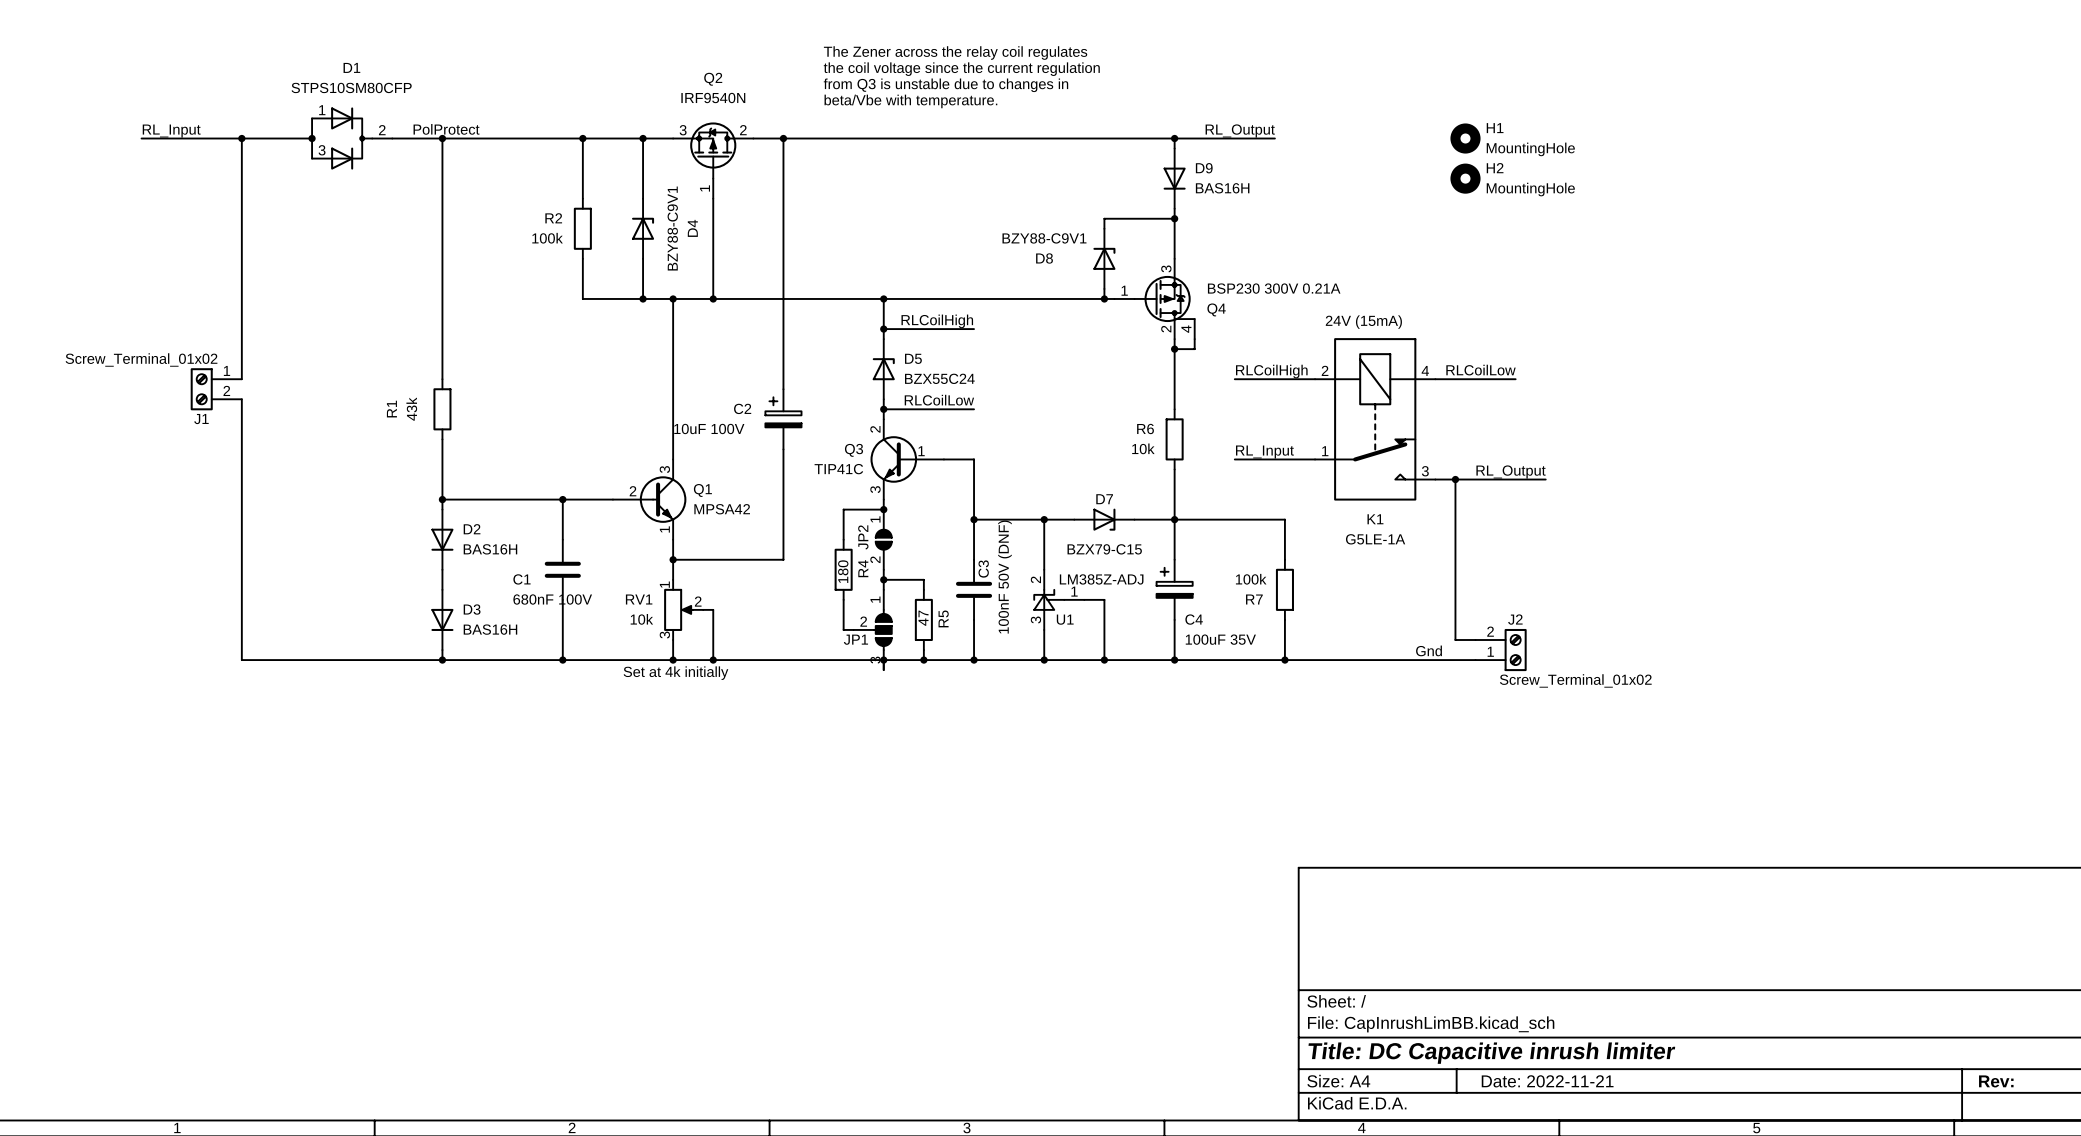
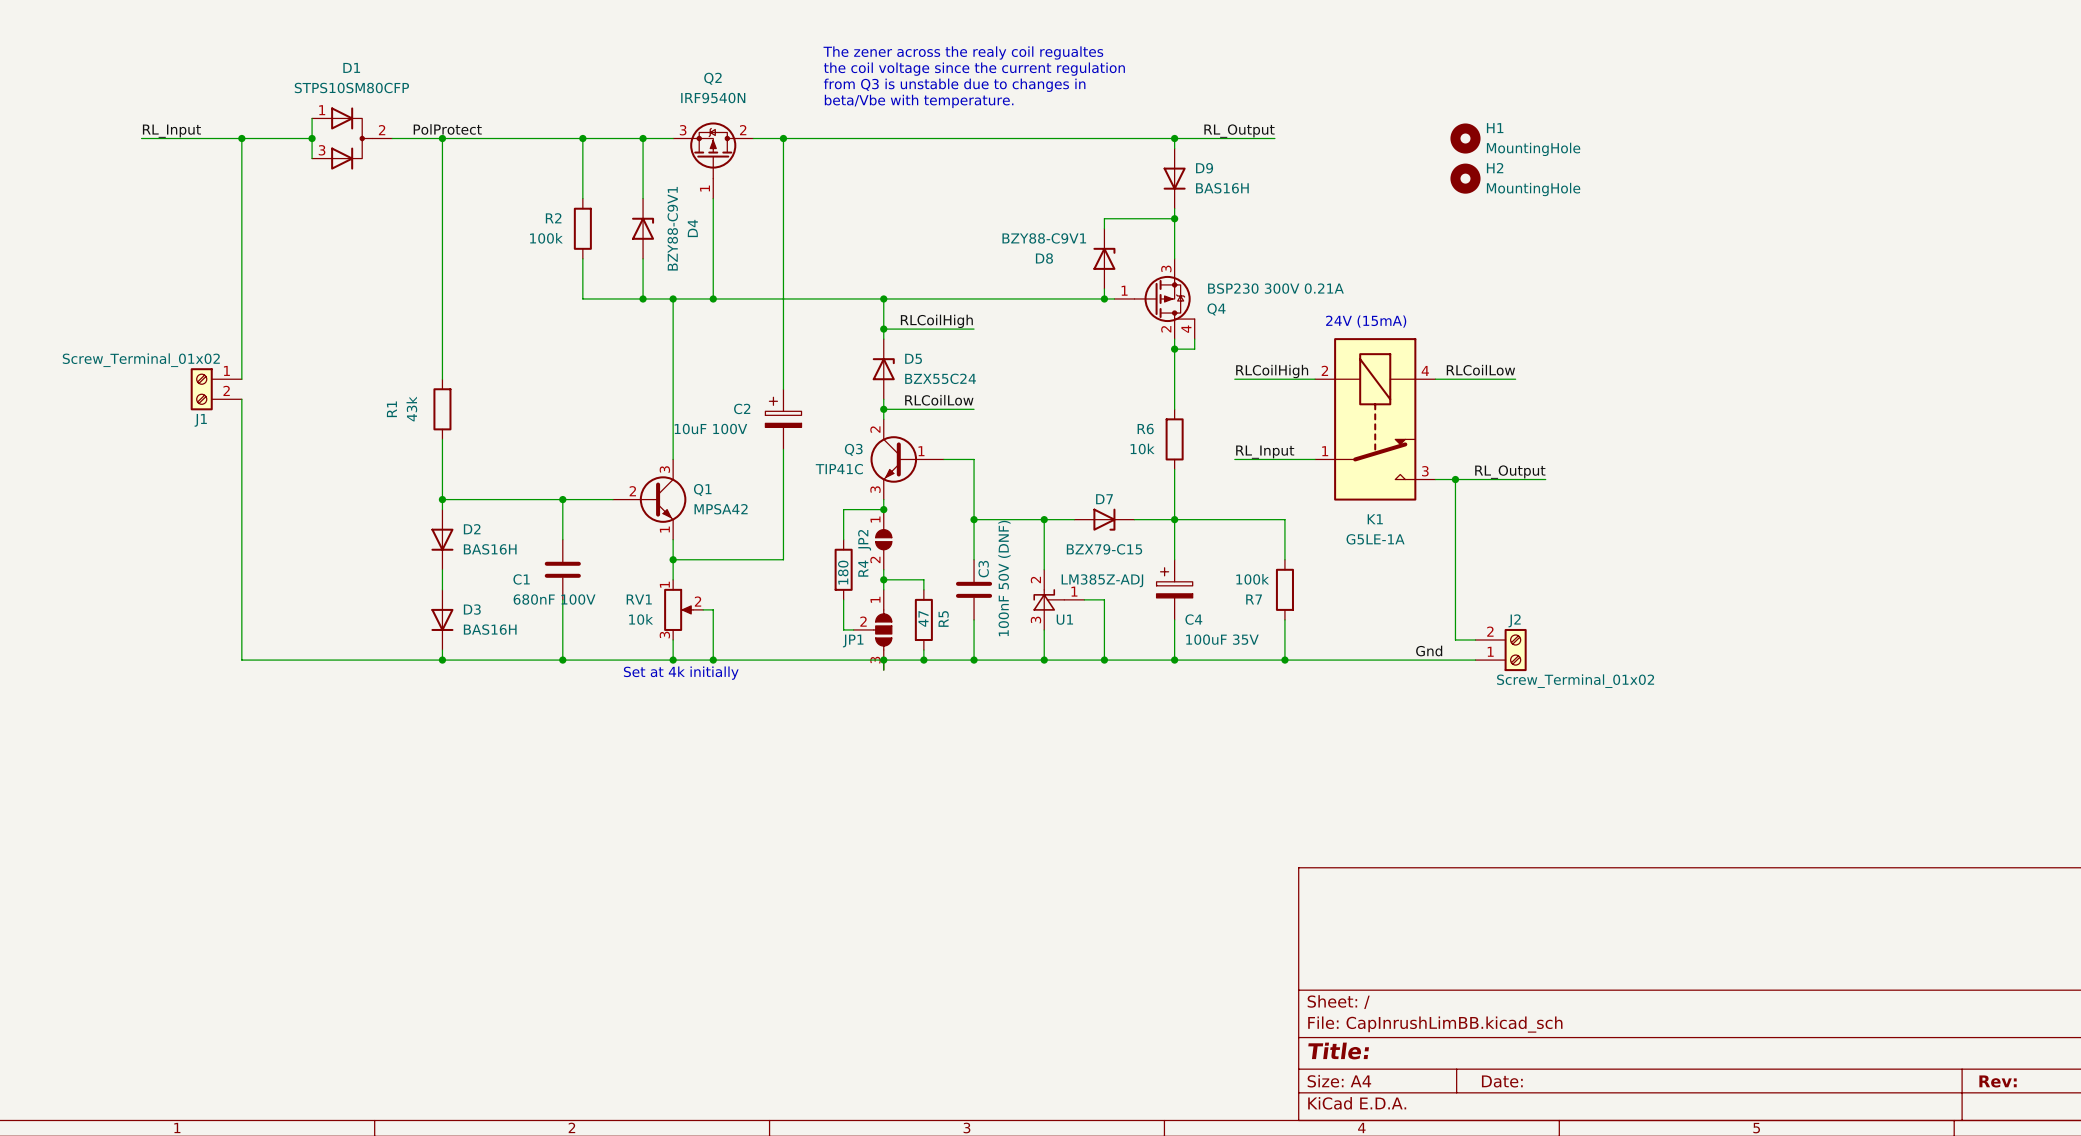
text: The Zener across the relay coil regulates (955, 53) -> The zener across the realy coil regualtes (963, 52)
title block: Title: DC Capacitive inrush limiter (1491, 1053) -> Title: (1338, 1051)
title block: Date: 2022-11-21 (1547, 1081) -> Date: (1502, 1081)

